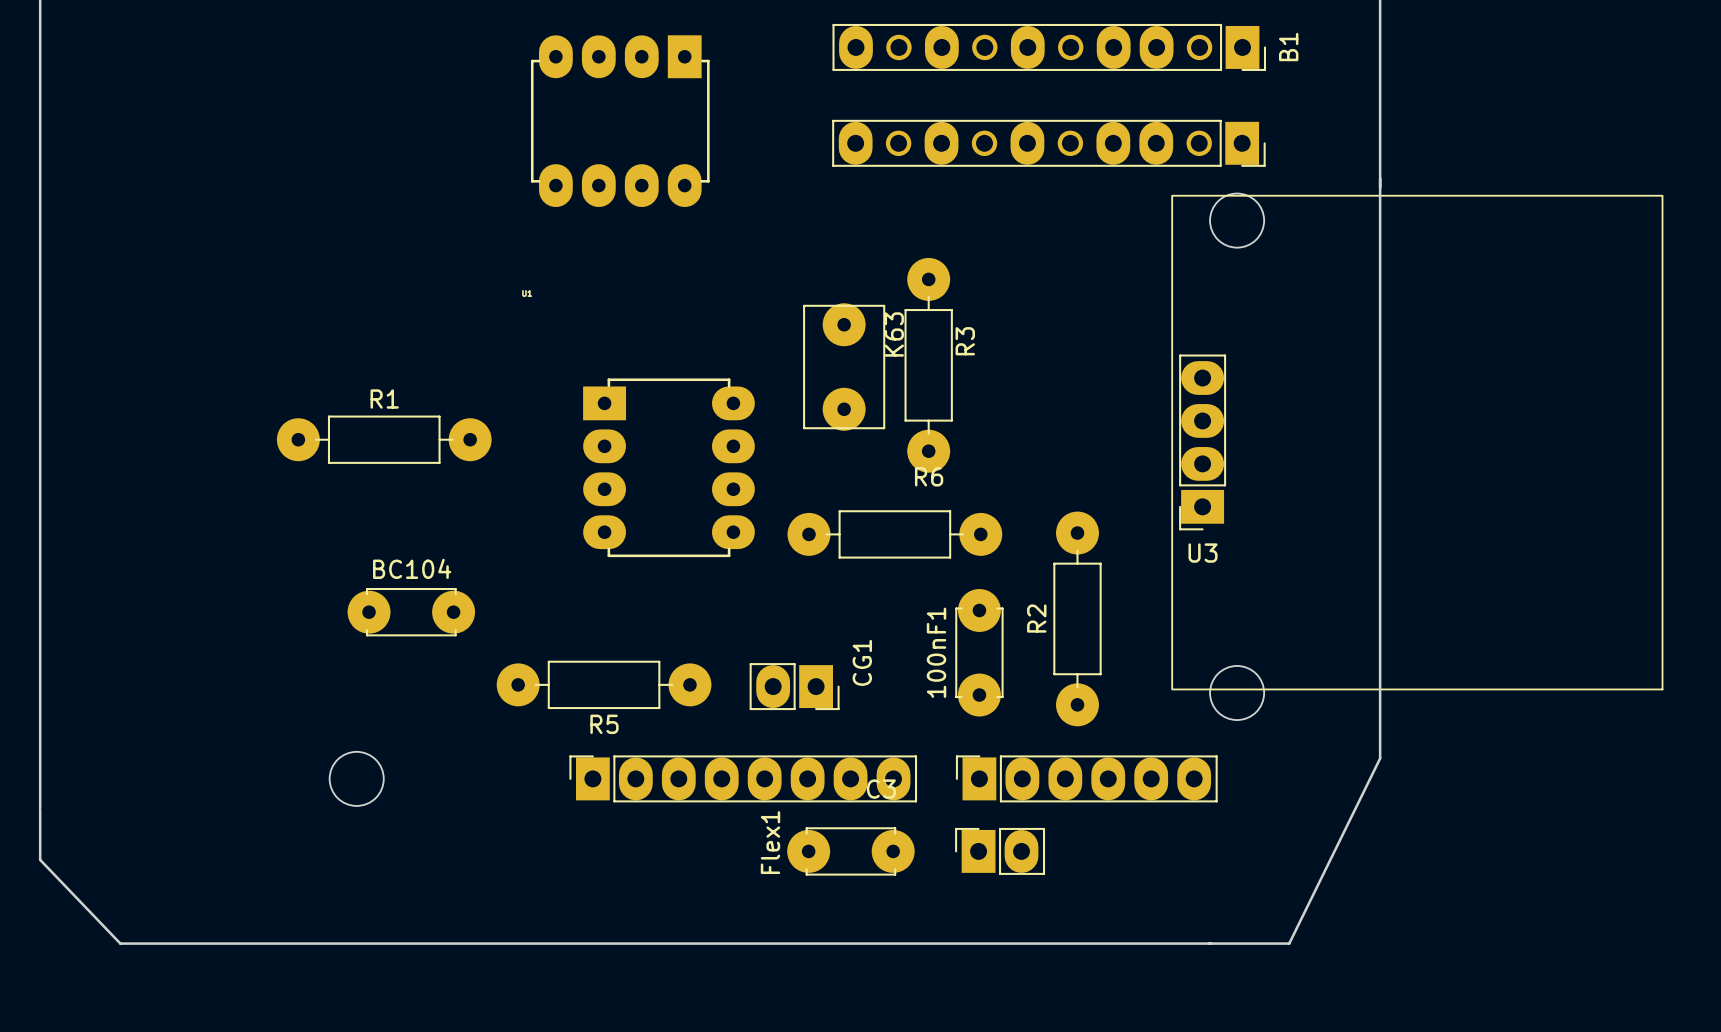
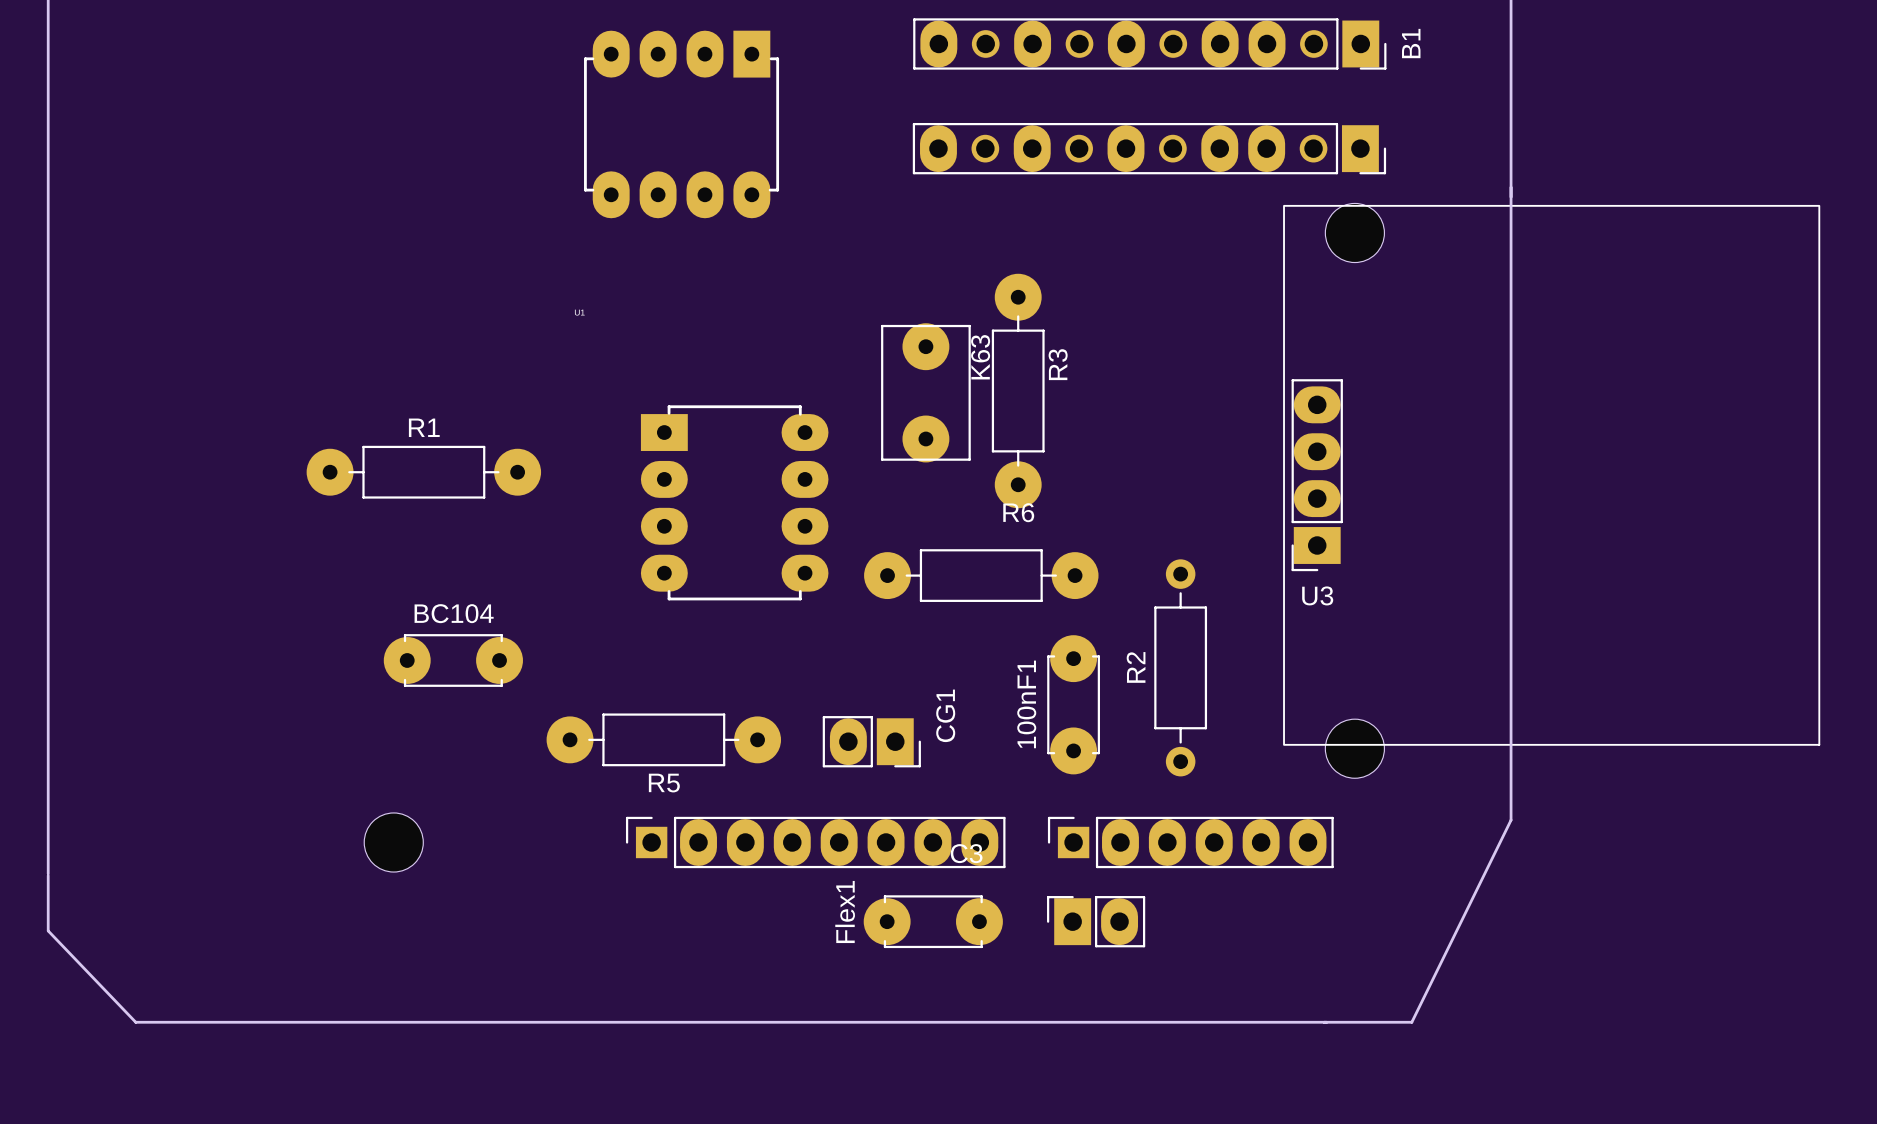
R2 footprint: [1053, 511, 1102, 727] -> [1154, 559, 1208, 777]
part footprint: [569, 755, 918, 803] -> [625, 816, 1006, 869]
part footprint: [955, 755, 1218, 803] -> [1047, 816, 1334, 869]

